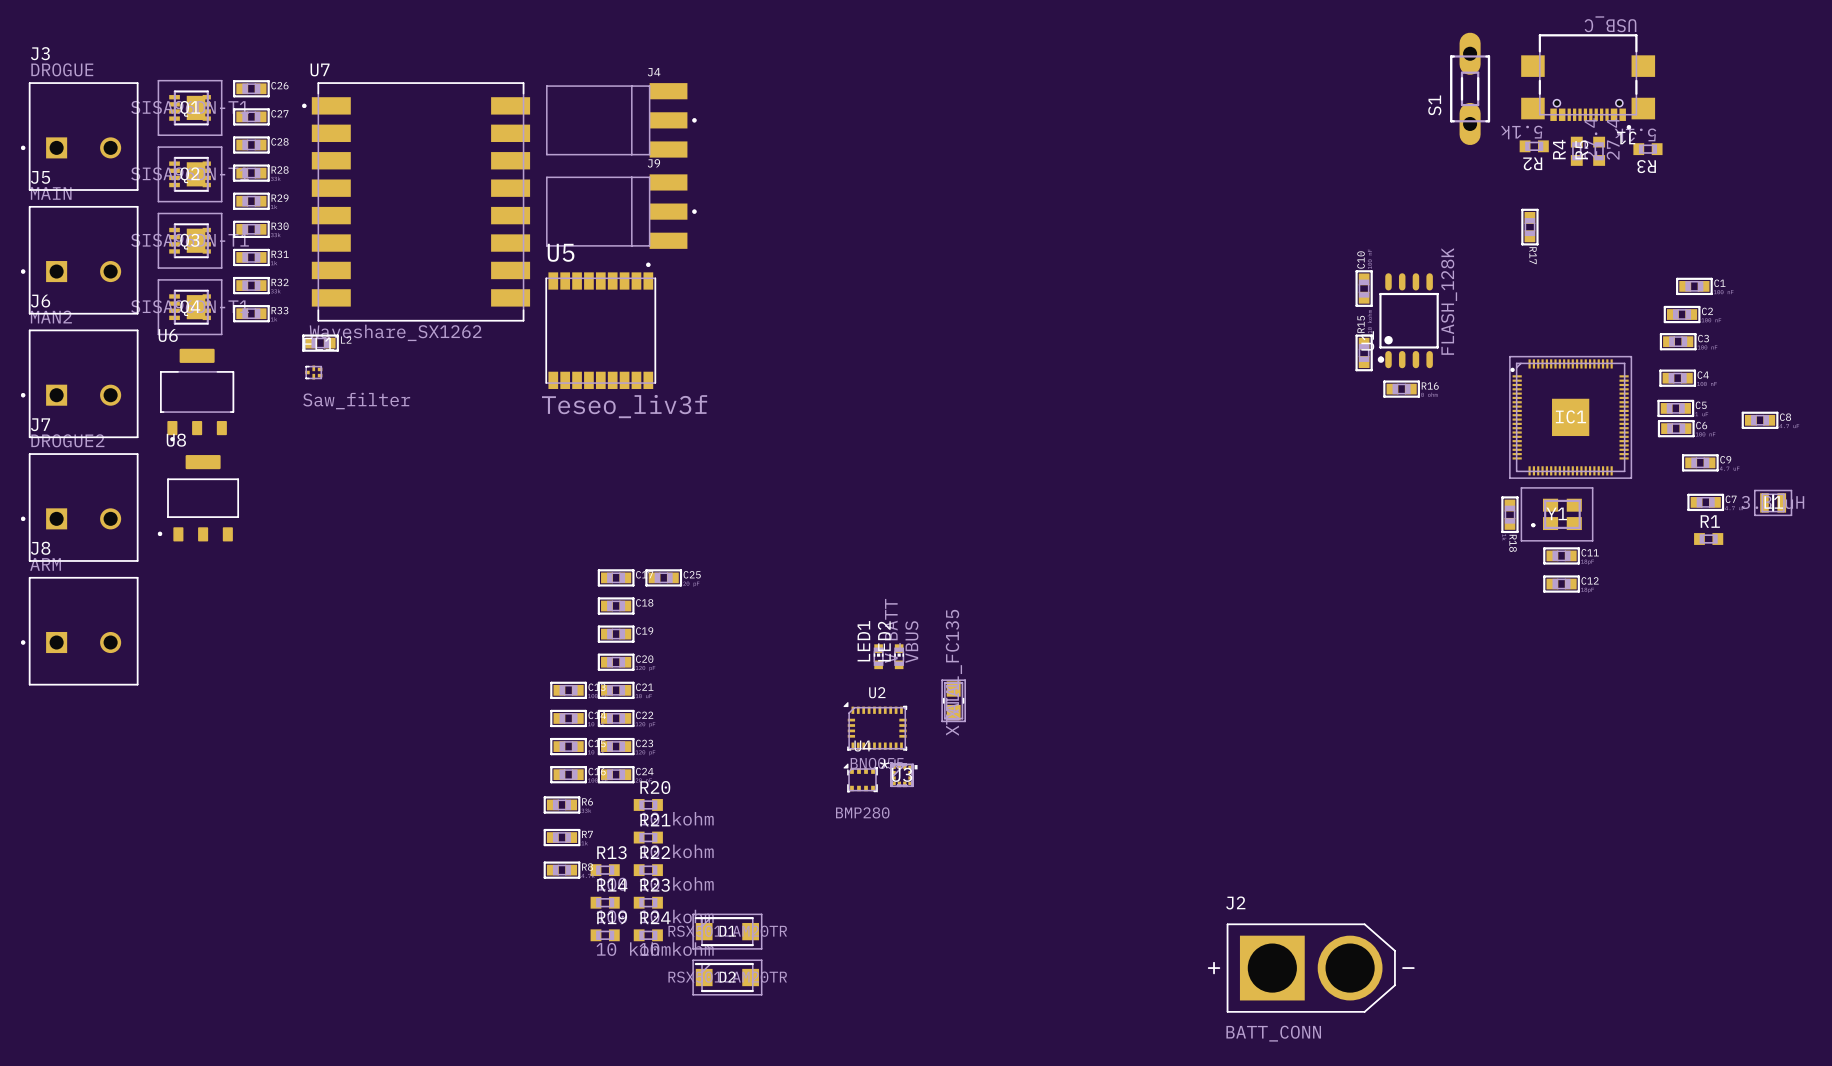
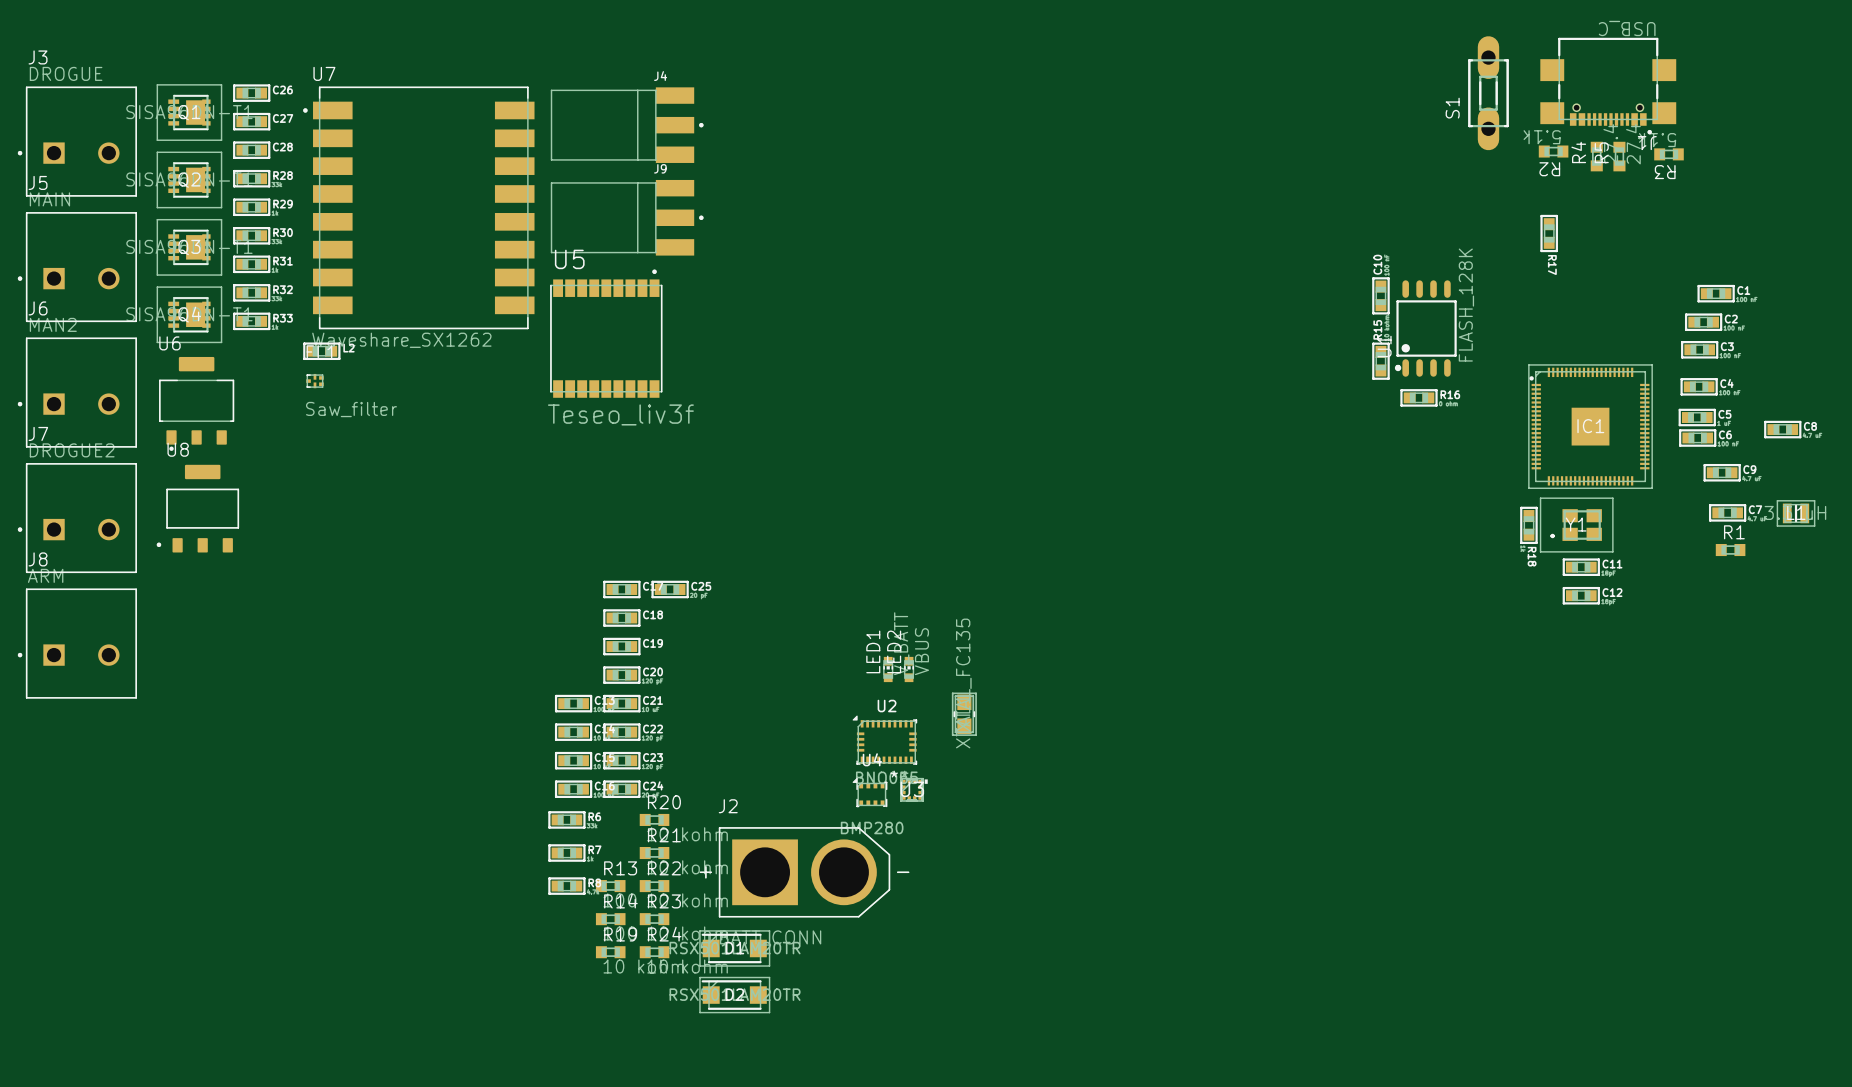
J2 position: (1311, 968) -> (804, 872)

